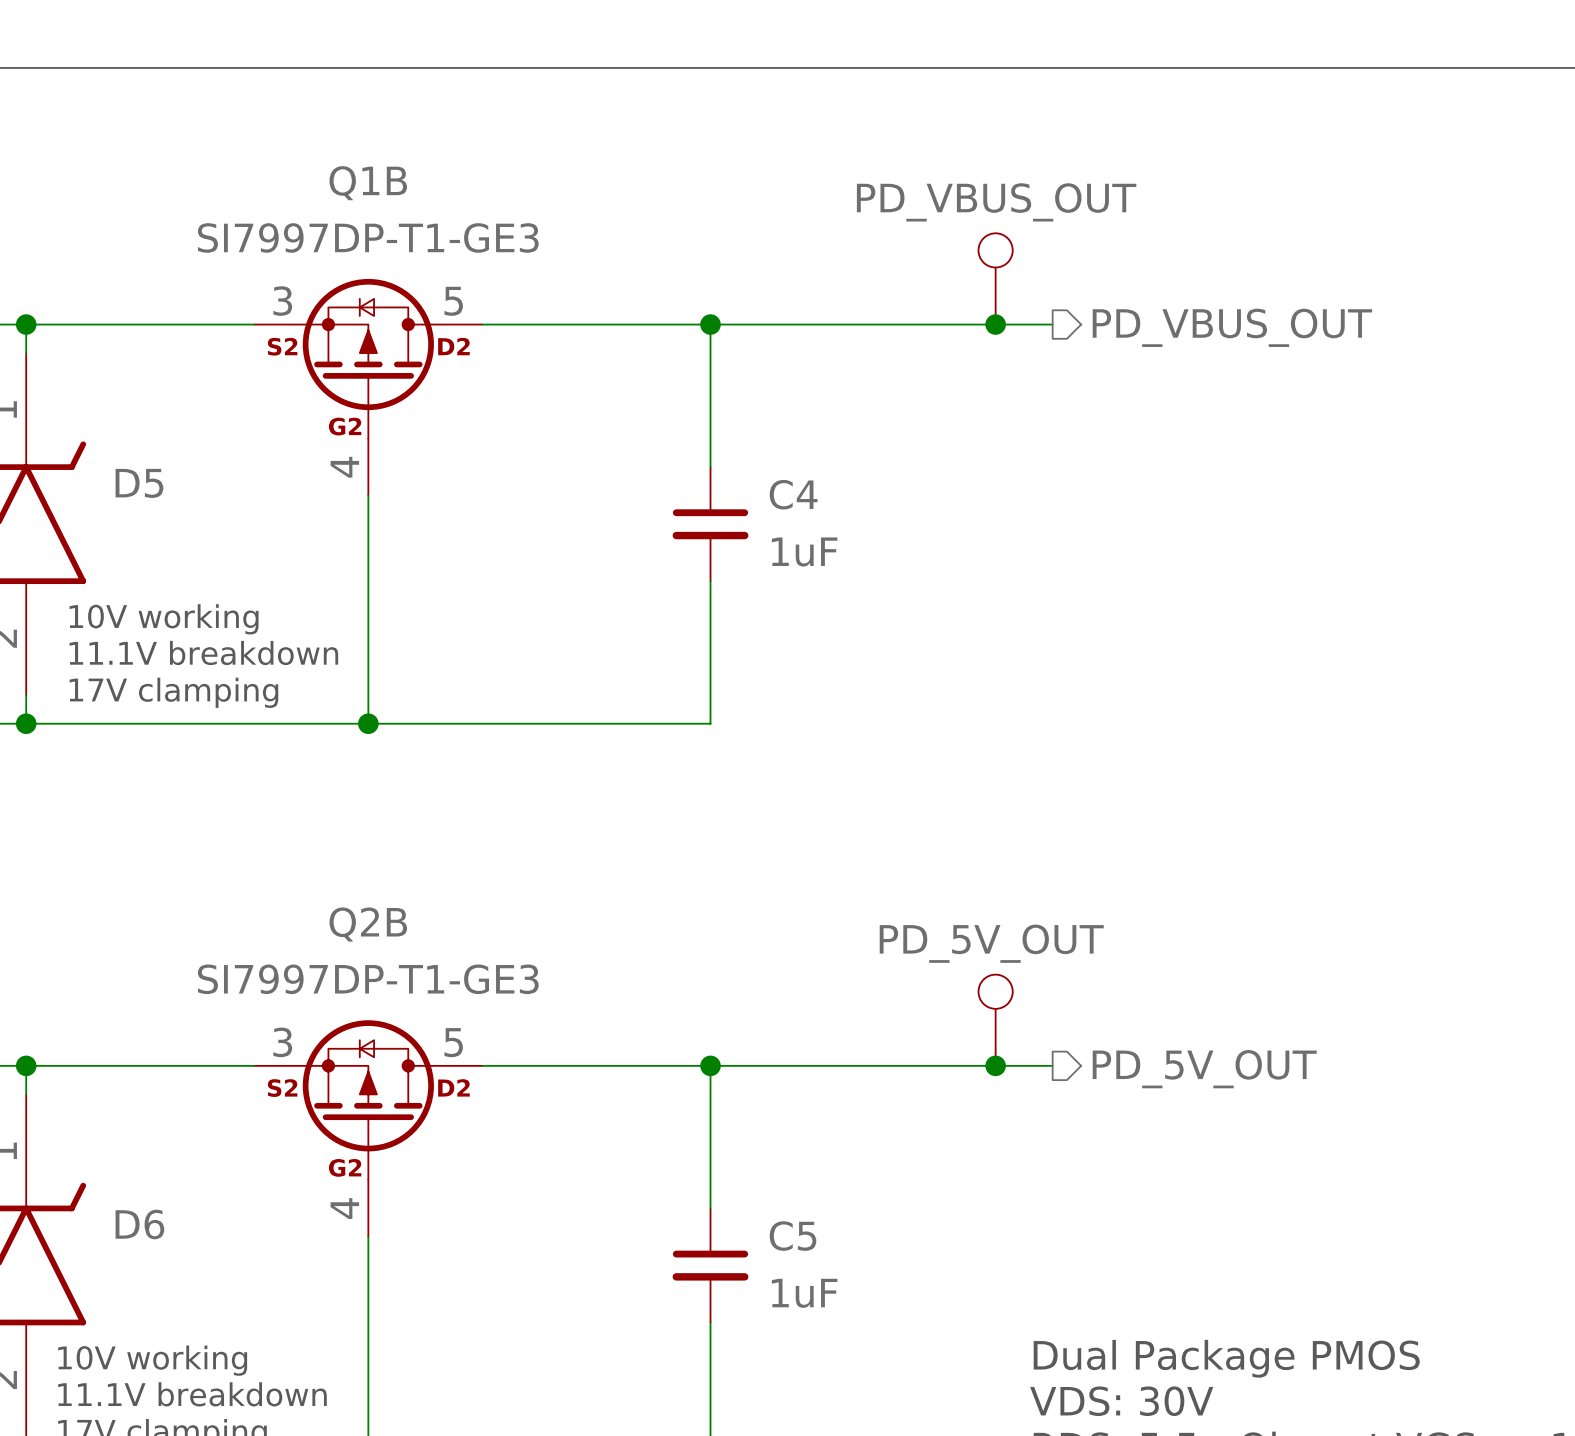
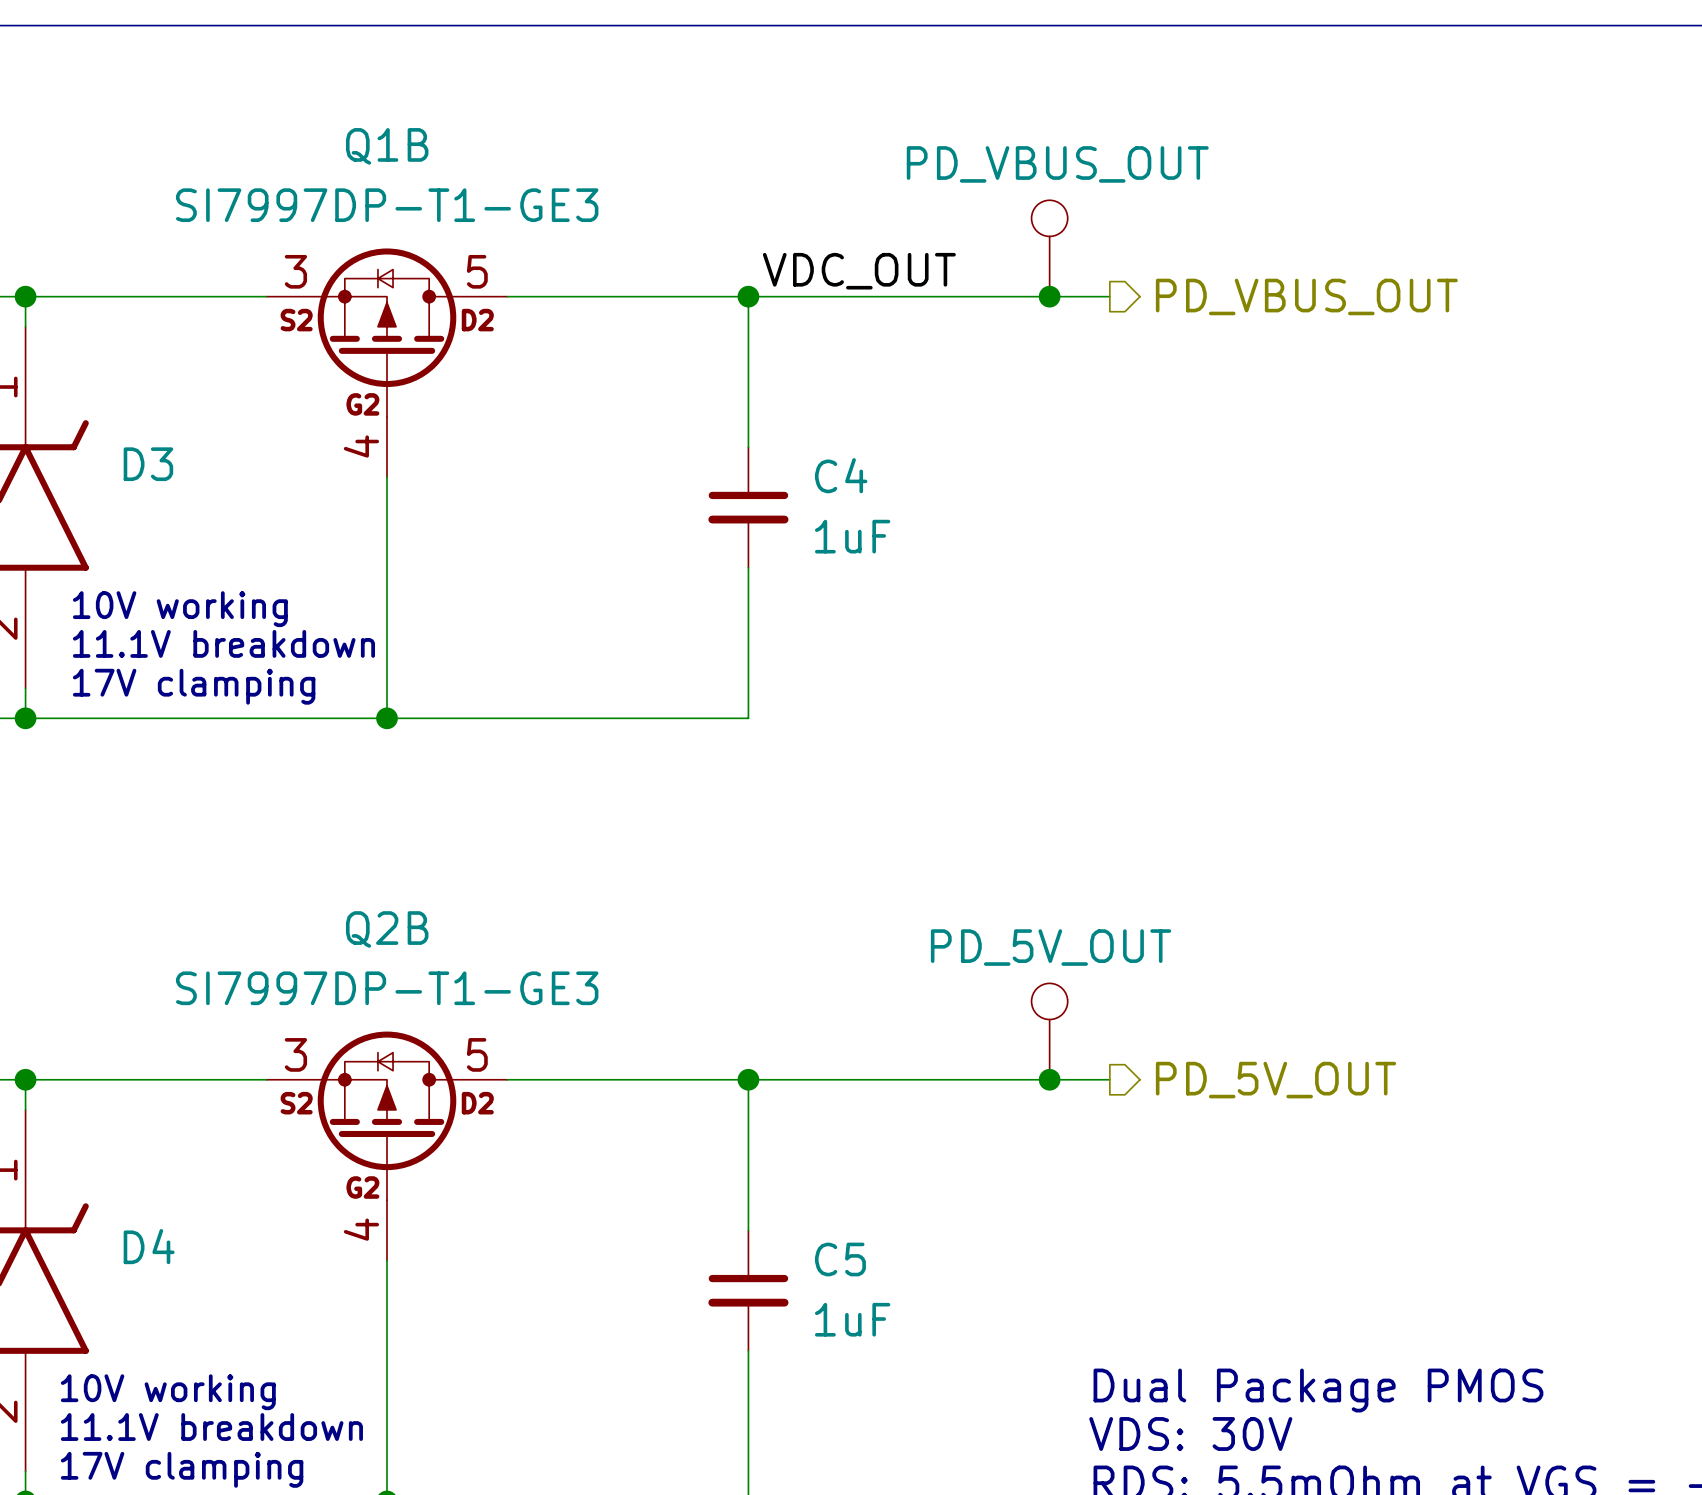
label: none -> VDC_OUT (859, 271)
D5 name: D5 (139, 483) -> D3 (148, 464)
D6 name: D6 (139, 1224) -> D4 (149, 1246)

